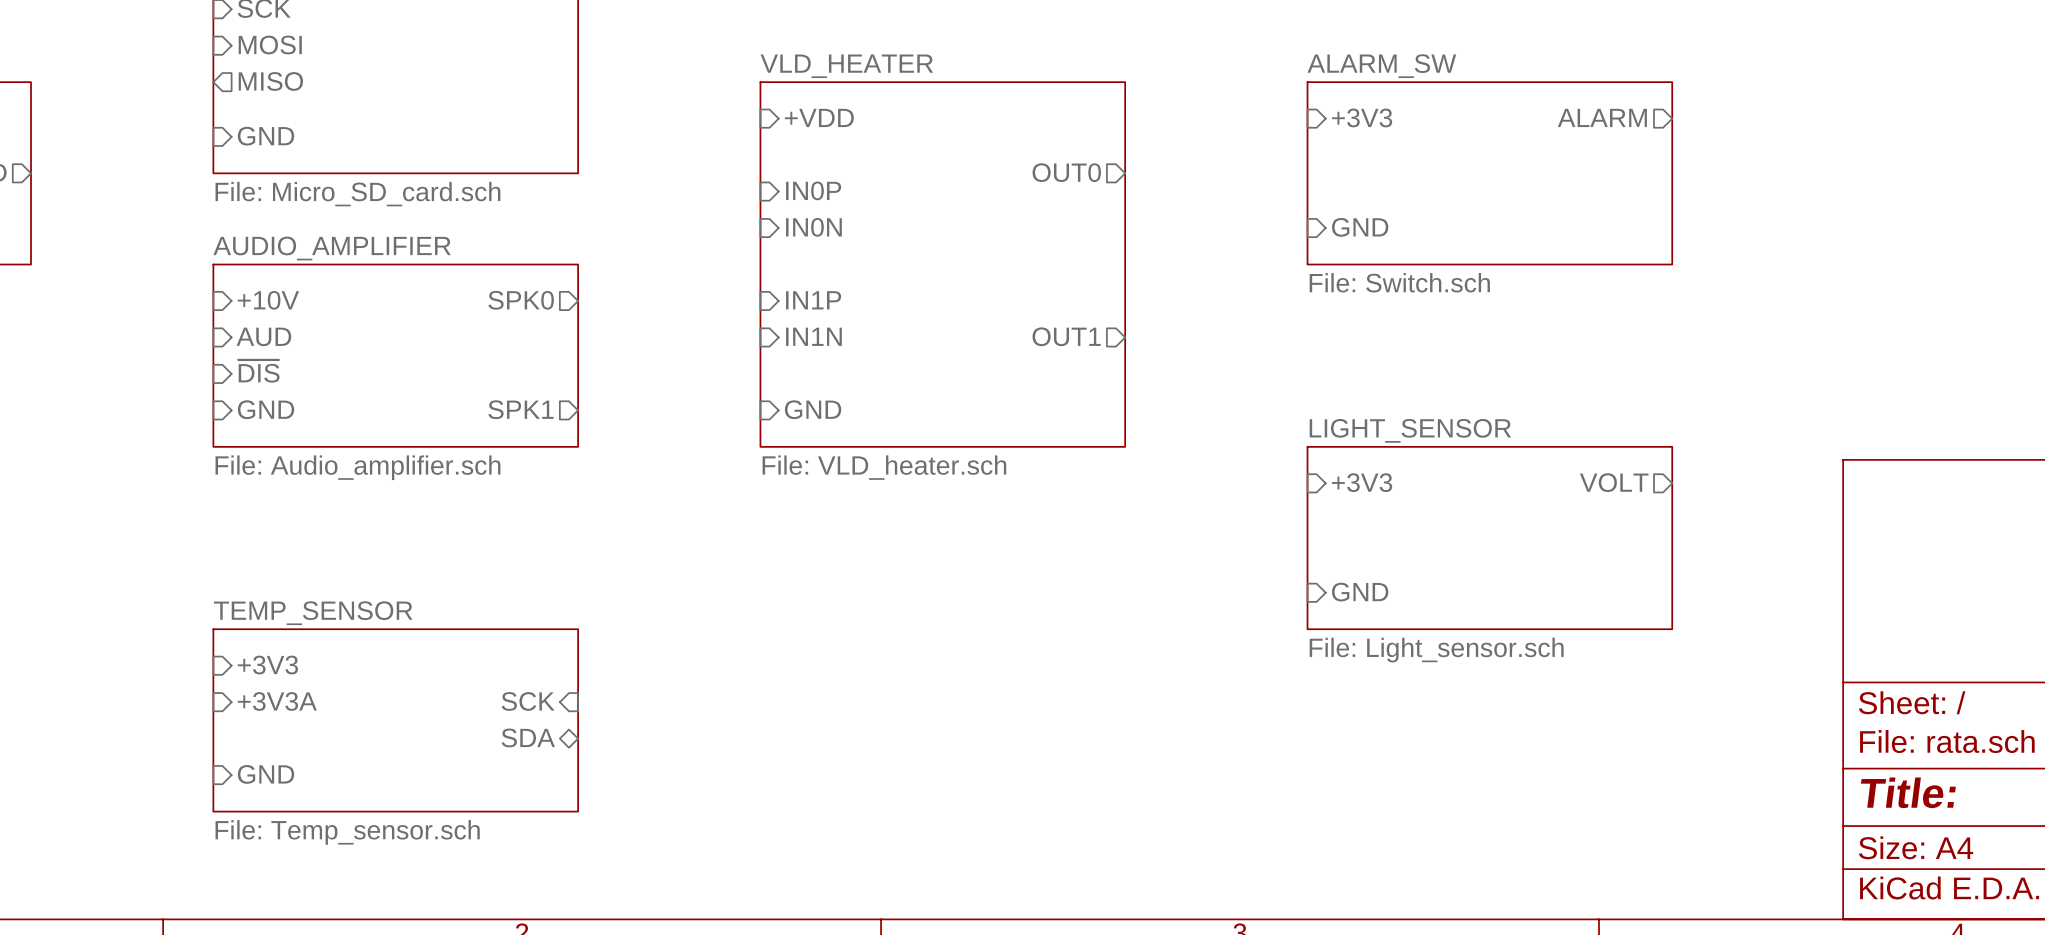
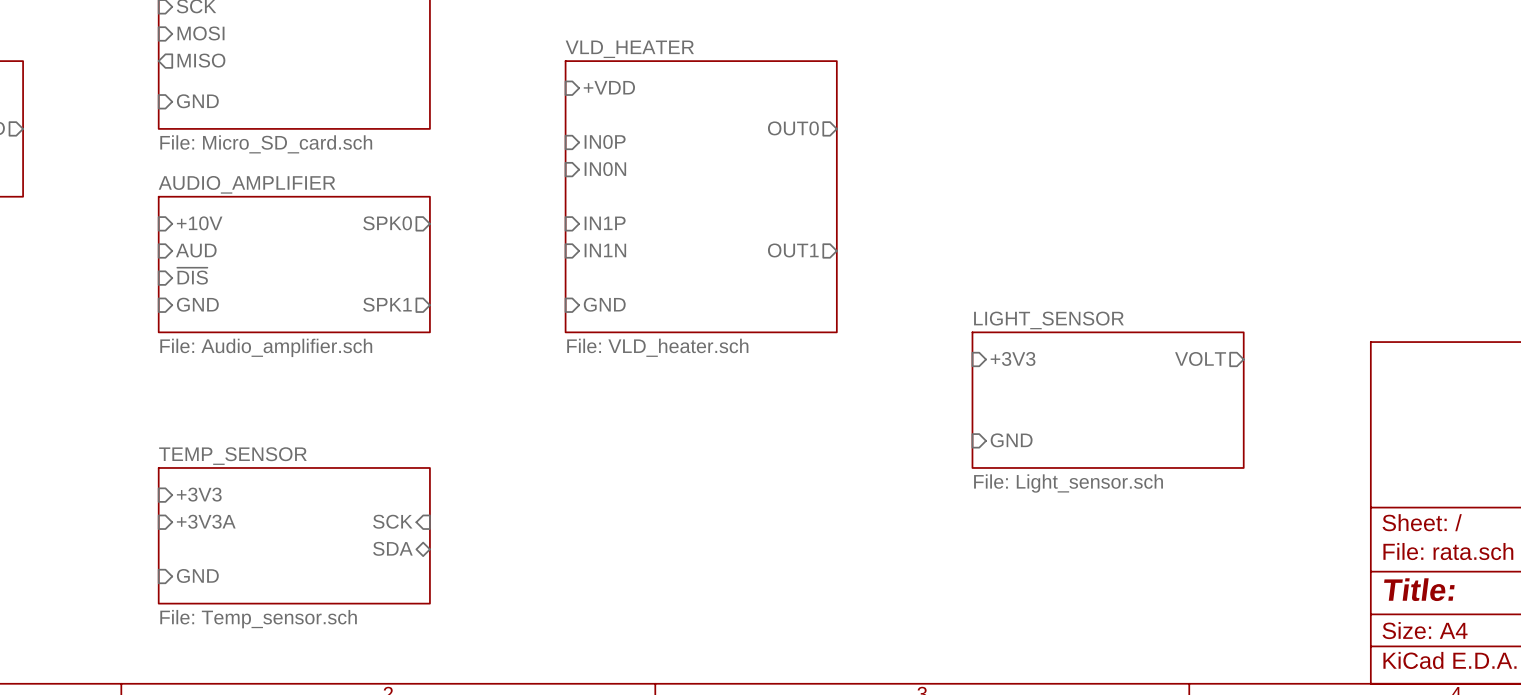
sheet pin: +3V3 (1362, 117) -> none
sheet pin: ALARM (1602, 117) -> none
sheet ALARM_SW: File: Switch.sch (1489, 173) -> none
sheet pin: GND (1360, 227) -> none

